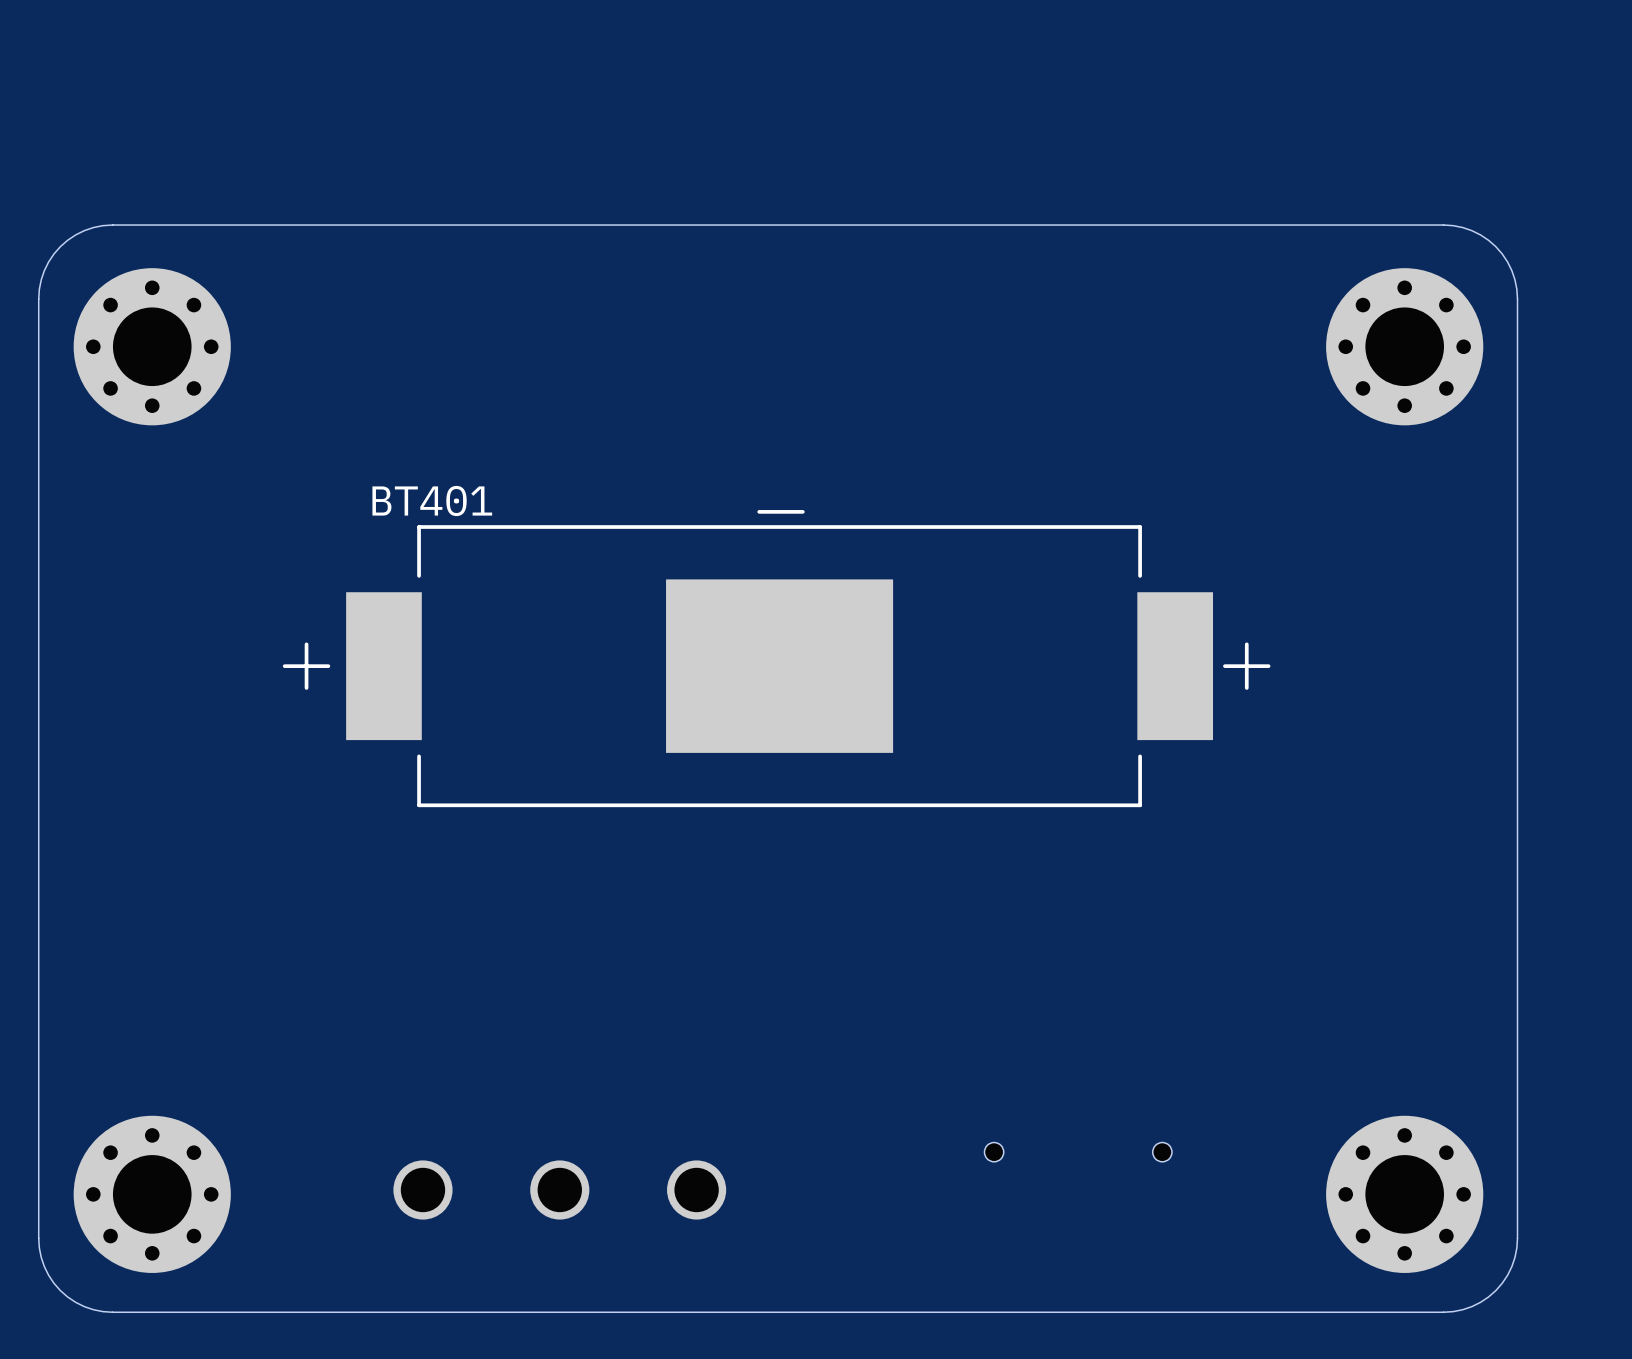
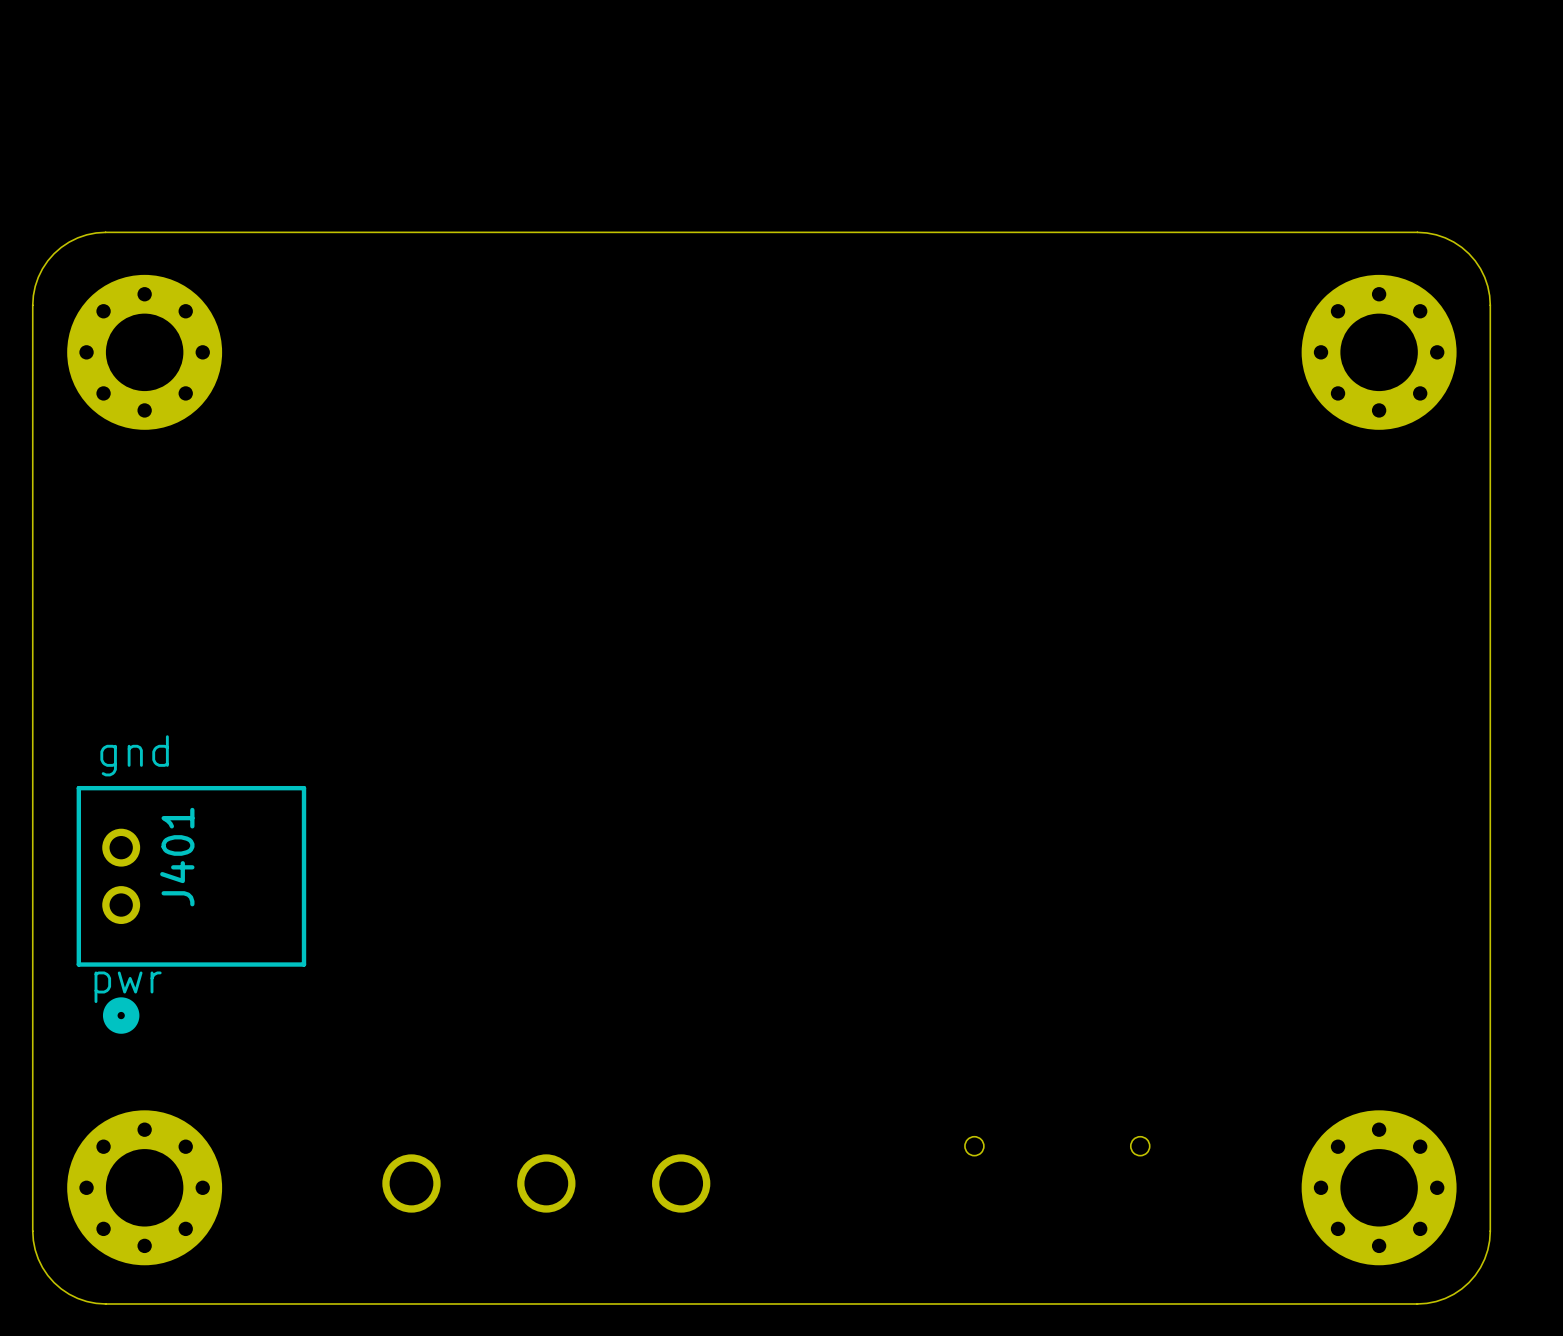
BT401: (776, 658) -> none
text: none -> gnd (134, 755)
J401: none -> (191, 909)
text: none -> pwr (128, 987)

